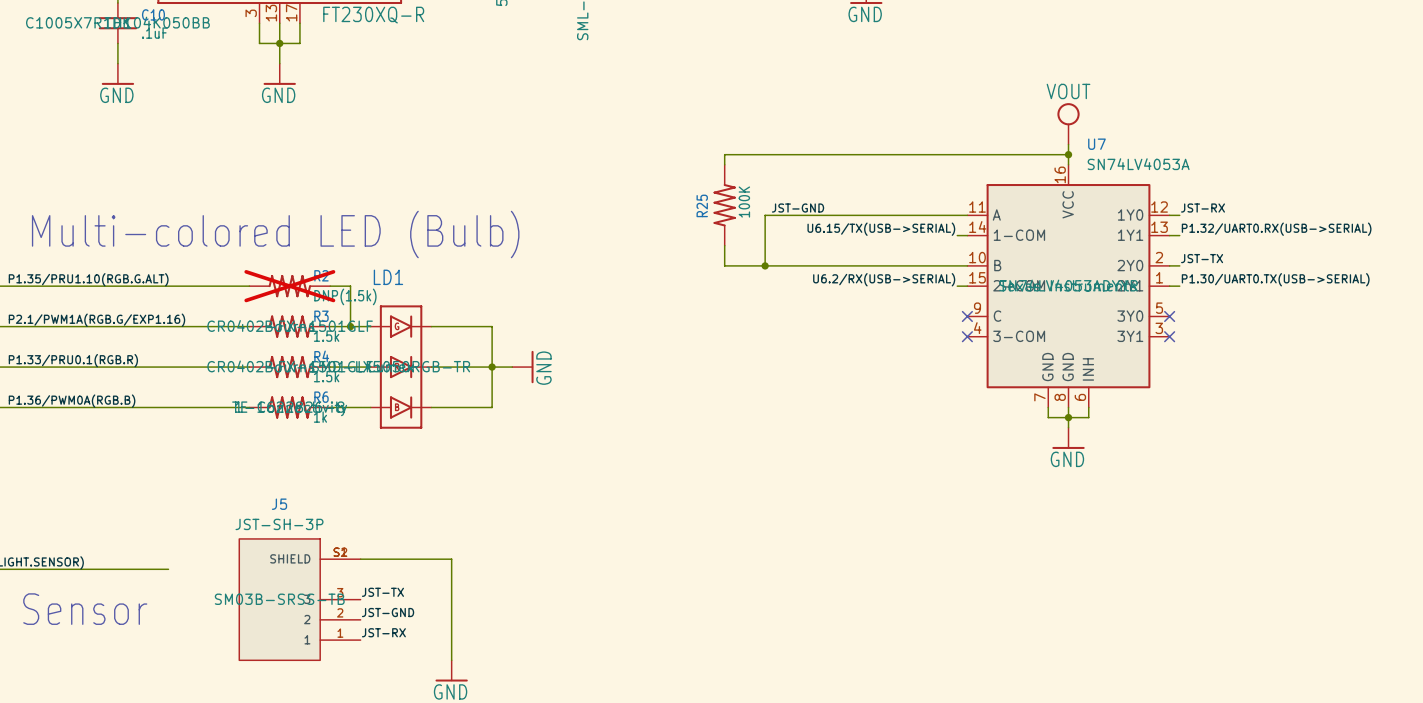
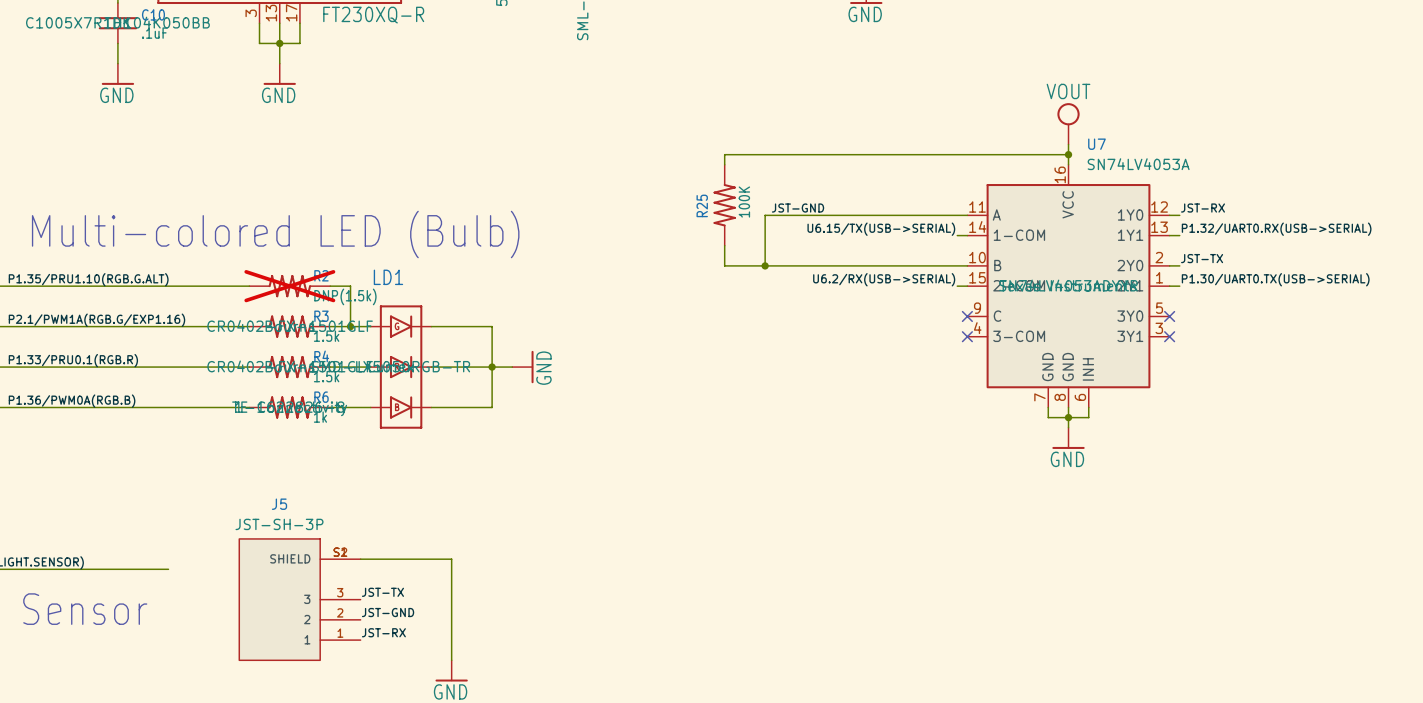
J5 text: SM03B-SRSS-TB (279, 599) -> none

